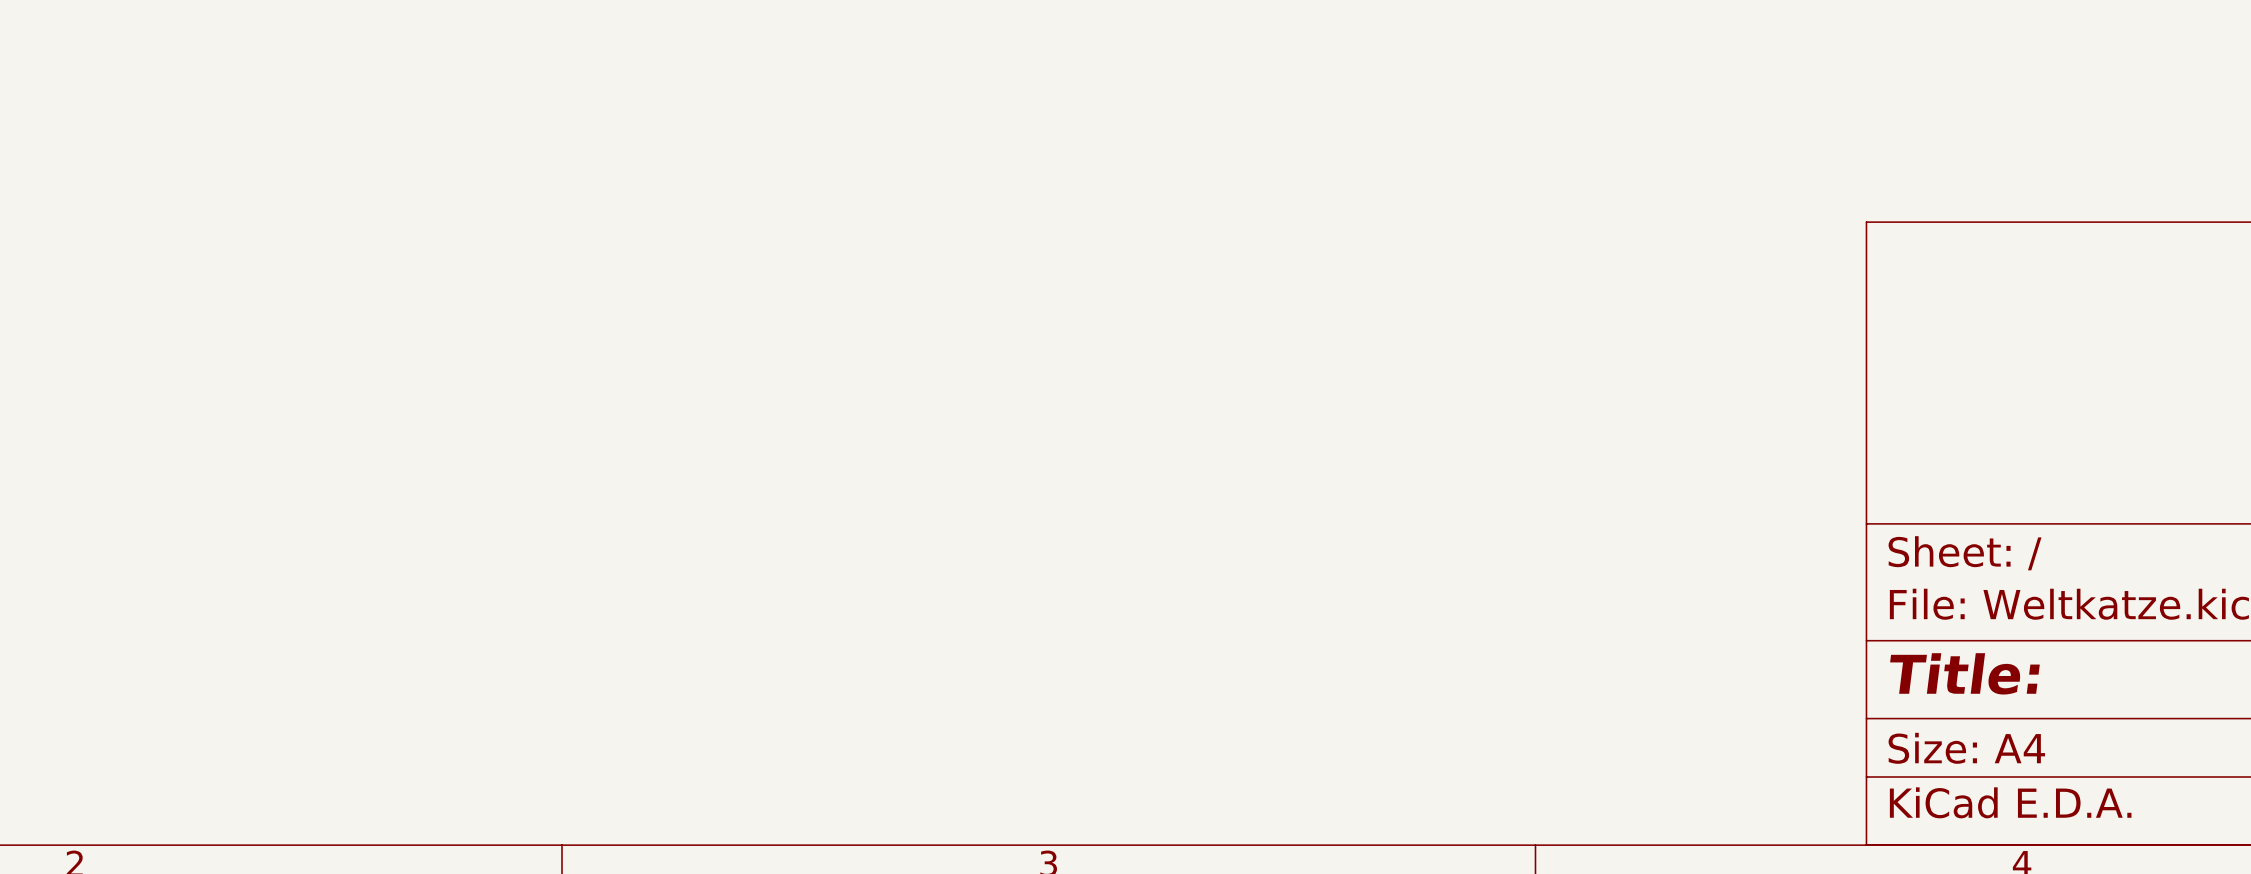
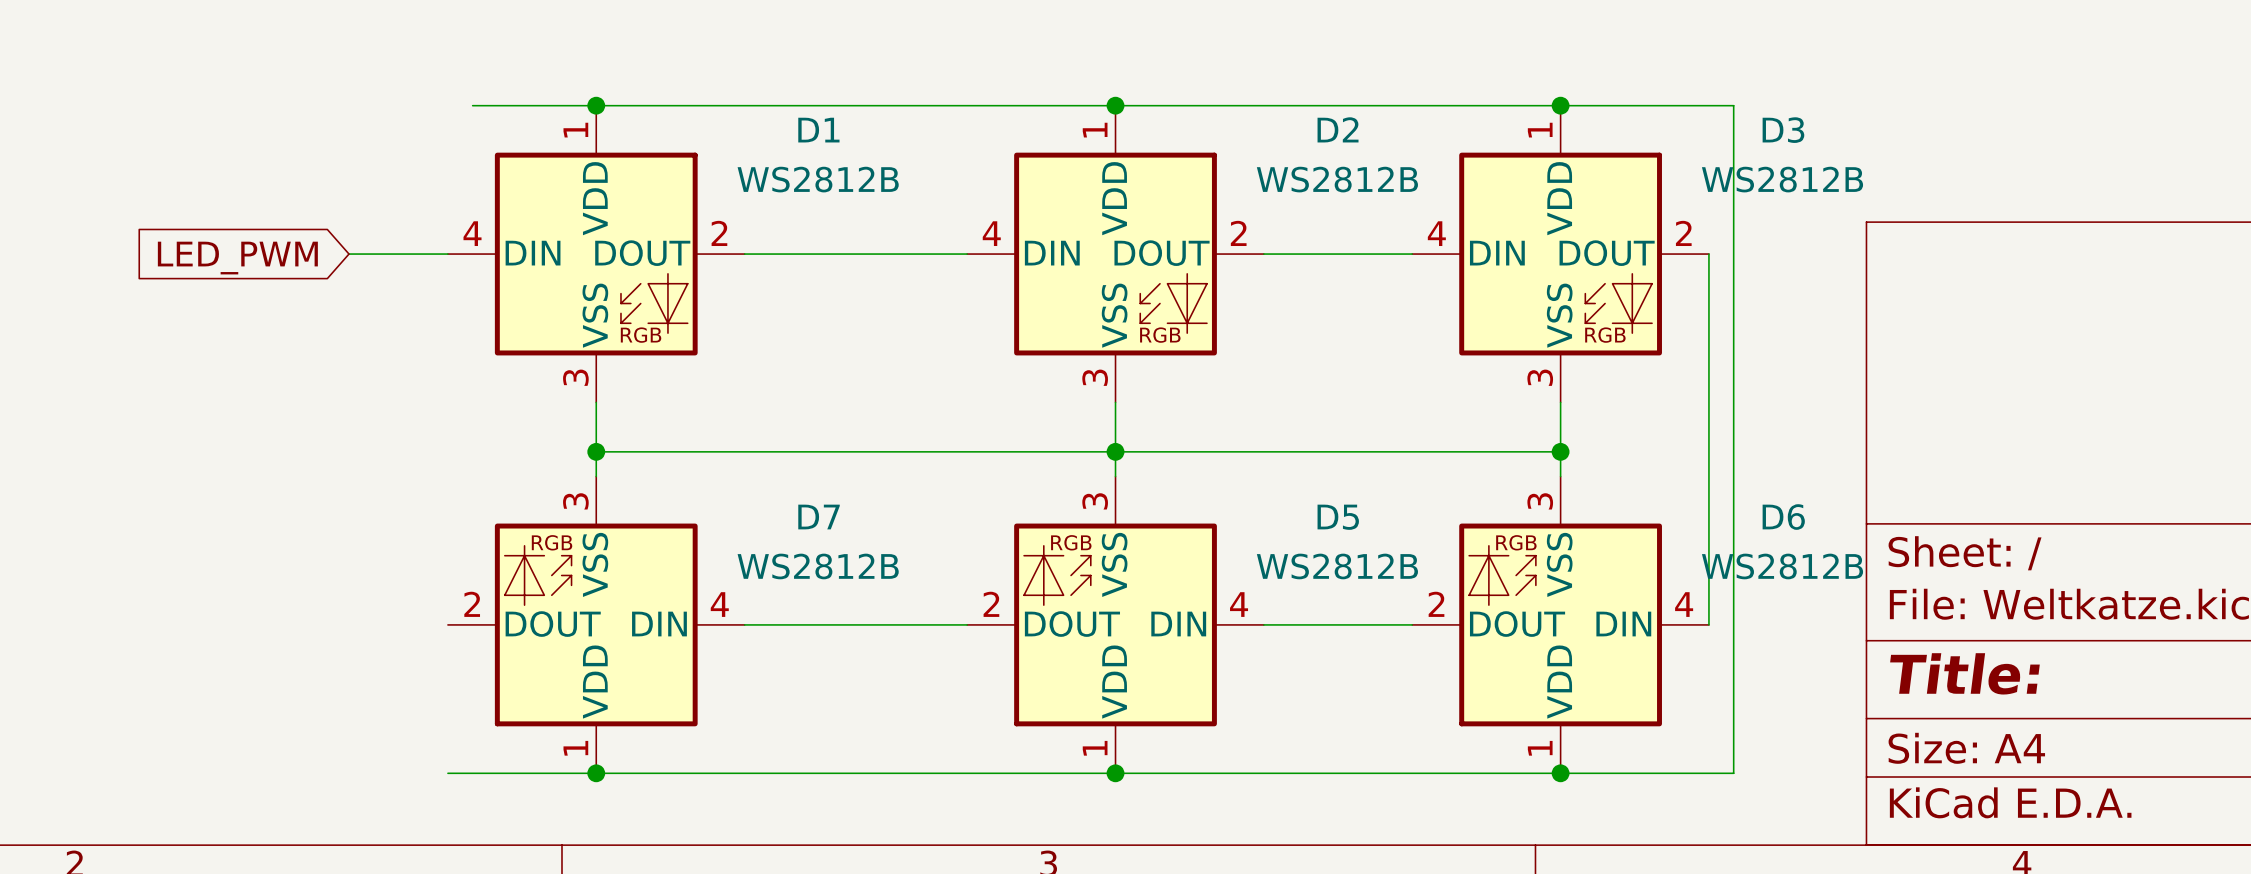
wire: none -> (472, 105) (1733, 105) (1733, 773) (447, 773)
junction: none -> (596, 105)
junction: none -> (1115, 105)
junction: none -> (1560, 105)
wire: none -> (348, 254) (447, 254)
D1: none -> WS2812B (596, 254)
wire: none -> (744, 254) (967, 254)
D2: none -> WS2812B (1115, 254)
wire: none -> (1263, 254) (1412, 254)
D3: none -> WS2812B (1560, 254)
wire: none -> (1708, 254) (1708, 624)
global label: none -> LED_PWM (237, 258)
wire: none -> (596, 402) (596, 476)
wire: none -> (1115, 402) (1115, 476)
wire: none -> (1560, 402) (1560, 476)
wire: none -> (596, 451) (1560, 451)
junction: none -> (596, 451)
junction: none -> (1115, 451)
junction: none -> (1560, 451)
D7: none -> WS2812B (596, 624)
wire: none -> (744, 624) (967, 624)
D5: none -> WS2812B (1115, 624)
wire: none -> (1263, 624) (1412, 624)
D6: none -> WS2812B (1560, 624)
junction: none -> (596, 773)
junction: none -> (1115, 773)
junction: none -> (1560, 773)

